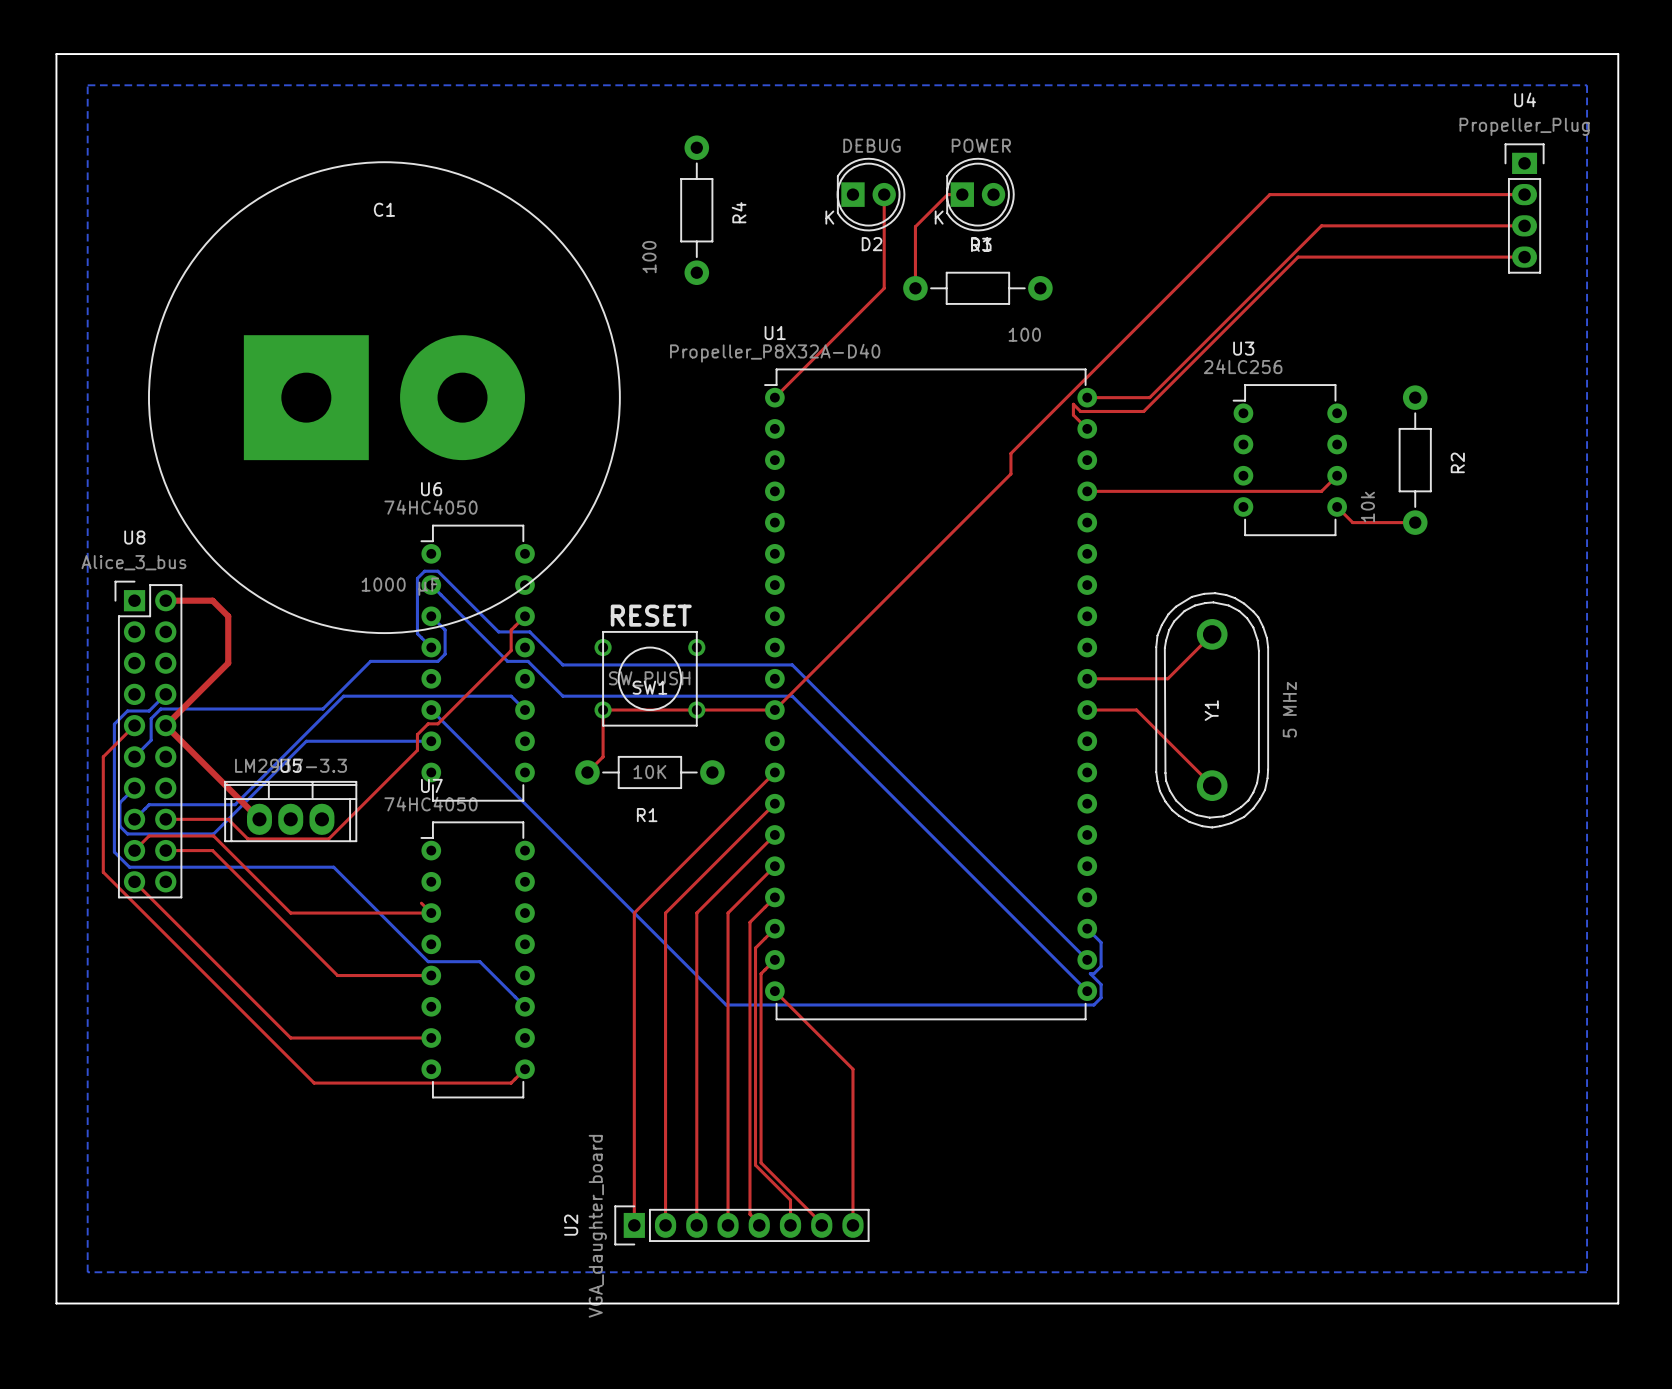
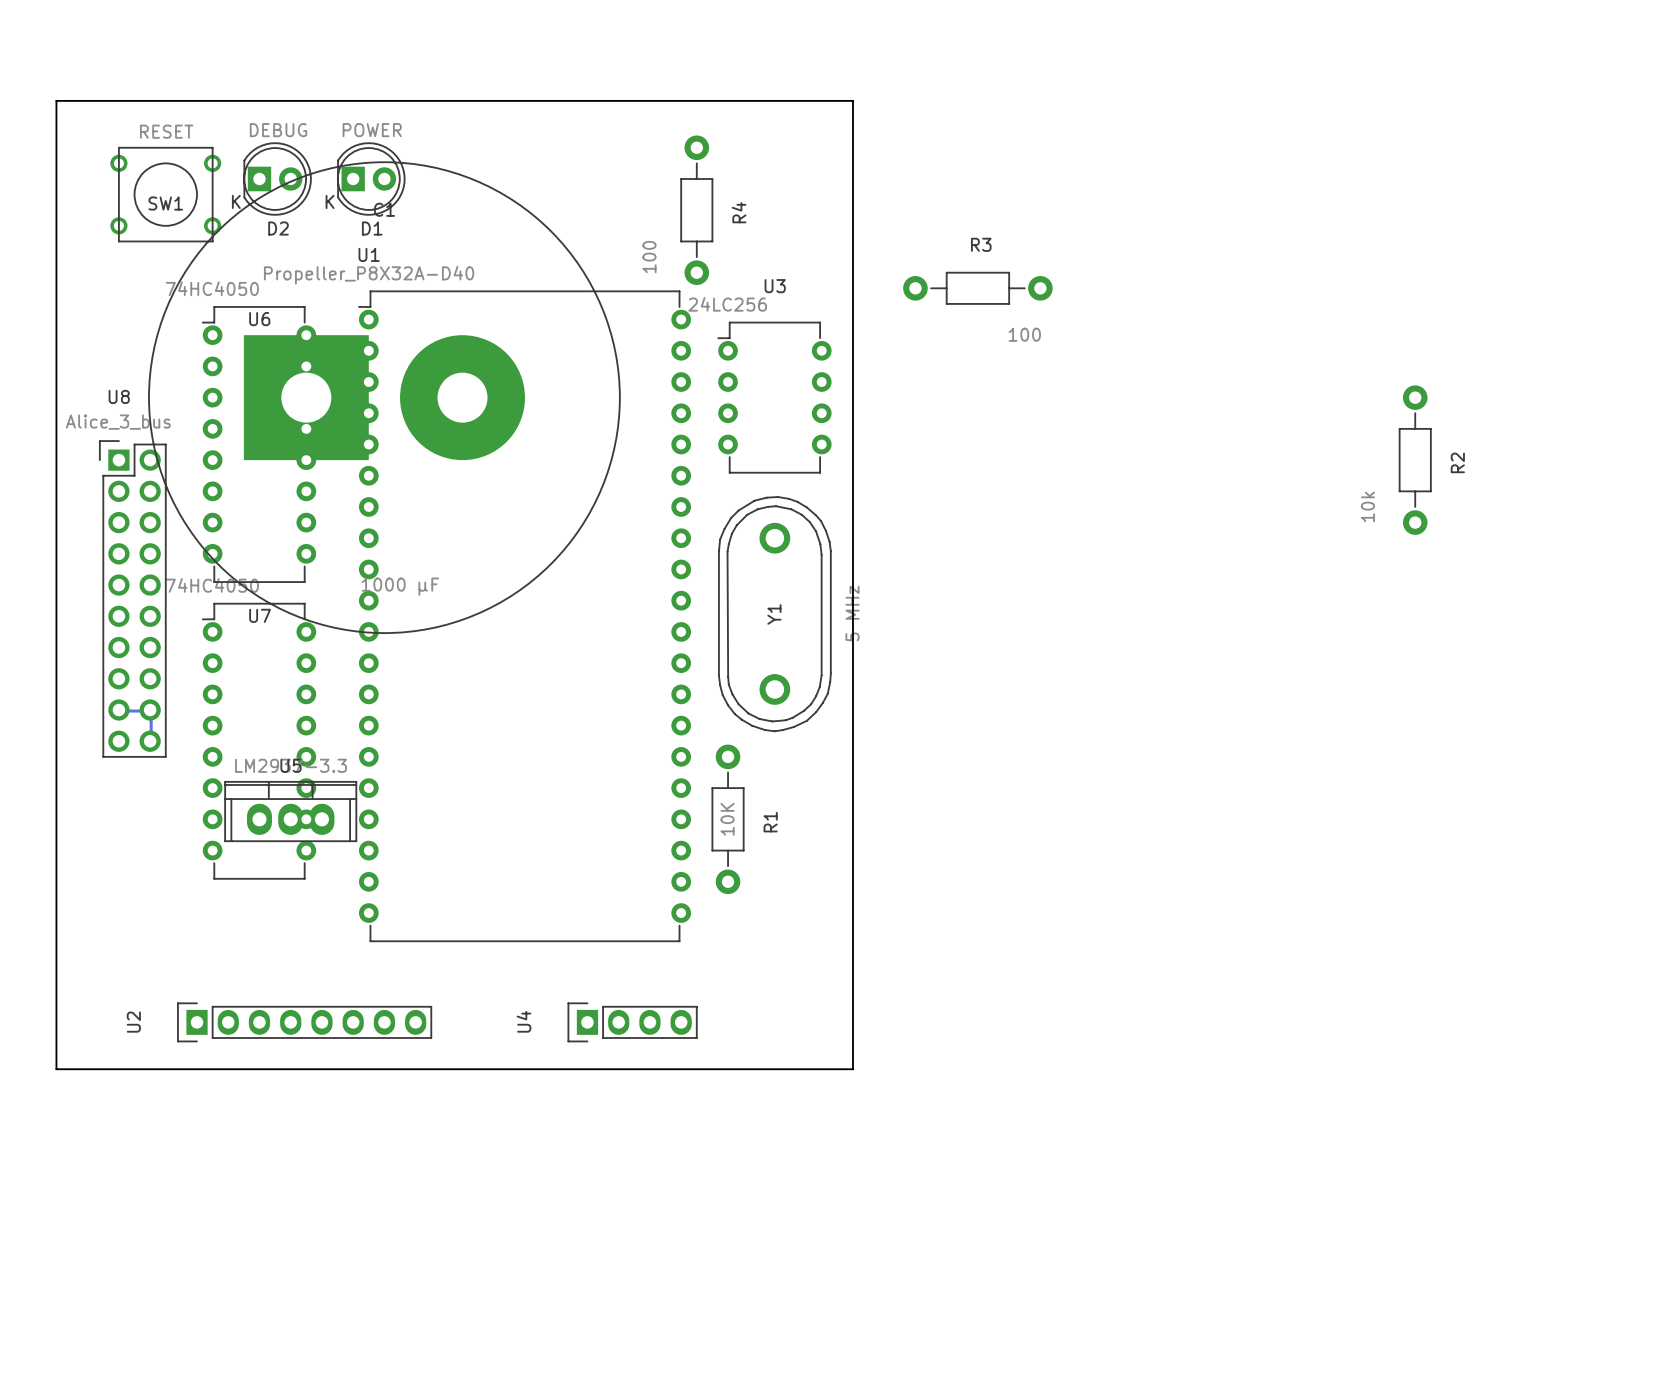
bottom zone outline: (87, 85) (87, 1272) (1587, 1272) (1587, 85) (87, 85) -> none
board edge: (56, 100) (56, 54) (1618, 54) (1618, 1303) (56, 1303) (56, 1069) -> (56, 100) (852, 100) (852, 1069) (56, 1069)
U4 value: Propeller_Plug (1524, 126) -> none
D2 position: (871, 194) -> (277, 178)
top track: (884, 194) (884, 288) (774, 397) -> none
top track: (962, 194) (947, 194) (915, 226) (915, 288) -> none
D1 position: (980, 194) -> (371, 178)
top track: (1524, 194) (1269, 194) (1010, 453) (1010, 473) (774, 710) (603, 710) (603, 756) (587, 772) -> none
U4 rotation: 0° (1524, 208) -> 90° counterclockwise (632, 1022)
U4 position: (1524, 208) -> (632, 1022)
top track: (1524, 225) (1321, 225) (1149, 397) (1087, 397) -> none
top track: (1524, 257) (1298, 257) (1143, 411) (1080, 411) (1073, 404) (1073, 415) (1087, 428) -> none
U3 name position: U3 (1243, 348) -> U3 (775, 286)
U3 position: (1289, 460) -> (774, 397)
top track: (1337, 475) (1321, 491) (1087, 491) -> none
U6 name position: U6 (431, 489) -> U6 (259, 319)
top track: (1337, 506) (1352, 522) (1415, 522) -> none
bottom track: (431, 585) (507, 661) (528, 661) (562, 696) (792, 696) (1087, 991) -> none
top track: (165, 600) (212, 600) (228, 616) (228, 663) (165, 725) (259, 819) -> none
text: RESET (651, 615) -> none
bottom track: (431, 616) (445, 630) (445, 654) (437, 661) (370, 661) (322, 709) (160, 709) (151, 718) -> none
top track: (524, 616) (511, 630) (511, 650) (437, 723) (428, 723) (417, 734) (417, 750) (328, 838) (247, 838) (228, 819) (165, 819) -> none
top track: (1212, 634) (1167, 678) (1087, 678) -> none
bottom track: (431, 647) (417, 633) (417, 578) (424, 571) (437, 571) (498, 631) (529, 631) (562, 664) (792, 664) (1087, 959) -> none
U6 position: (477, 663) -> (259, 444)
SW1 position: (649, 678) -> (165, 194)
SW1 value: SW_PUSH (649, 678) -> RESET (166, 131)
bottom track: (165, 694) (149, 711) -> none
U1 position: (930, 694) -> (524, 616)
bottom track: (431, 710) (726, 1004) (1093, 1004) (1101, 997) (1101, 984) (1090, 973) (1093, 973) (1101, 966) (1101, 942) (1087, 928) -> none
bottom track: (524, 710) (511, 696) (343, 696) (235, 804) (149, 804) (134, 819) -> none
top track: (1087, 710) (1136, 710) (1212, 785) -> none
Y1 position: (1212, 710) -> (774, 614)
bottom track: (127, 711) (114, 724) (114, 852) (129, 867) (333, 867) (428, 961) (479, 961) (524, 1006) -> none
top track: (134, 725) (103, 756) (103, 872) (314, 1083) (511, 1083) (524, 1069) -> none
U8 position: (148, 739) -> (132, 598)
bottom track: (151, 740) (134, 756) -> none
bottom track: (431, 741) (306, 741) (213, 833) (127, 833) (119, 826) (119, 802) (134, 788) -> none
R1 rotation: 0° (649, 772) -> 90° clockwise (728, 819)
R1 position: (649, 772) -> (728, 819)
top track: (774, 772) (634, 913) (634, 1225) -> none
U7 name position: U7 (431, 785) -> U7 (260, 615)
top track: (774, 803) (665, 913) (665, 1225) -> none
R1 name position: R1 (647, 815) -> R1 (770, 822)
top track: (774, 834) (696, 913) (696, 1225) -> none
top track: (134, 850) (149, 835) (213, 835) (290, 913) (431, 913) (421, 903) -> none
top track: (165, 850) (212, 850) (337, 975) (431, 975) -> none
top track: (774, 866) (728, 913) (728, 1225) -> none
top track: (134, 881) (290, 1038) (431, 1038) -> none
top track: (774, 897) (749, 922) (749, 1214) (759, 1225) -> none
top track: (774, 928) (755, 948) (755, 1165) (790, 1200) (790, 1225) -> none
U7 position: (477, 959) -> (259, 741)
top track: (774, 959) (761, 973) (761, 1162) (821, 1225) -> none
top track: (774, 991) (852, 1069) (852, 1225) -> none
U2 position: (741, 1225) -> (304, 1022)
U2 value: VGA_daughter_board (597, 1226) -> none

